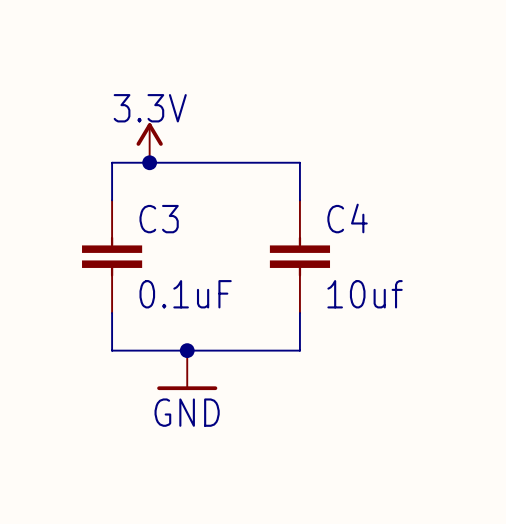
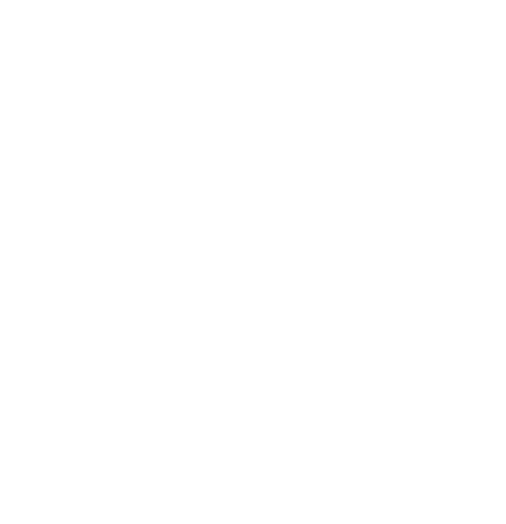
power symbol: 3.3V (149, 143) -> none
junction: (149, 162) -> none
wire: (112, 200) (112, 162) (299, 162) (299, 200) -> none
C3: 0.1uF (112, 256) -> none
C4: 10uf (299, 256) -> none
wire: (112, 313) (112, 350) (299, 350) (299, 313) -> none
junction: (187, 350) -> none
power symbol: GND (187, 370) -> none

